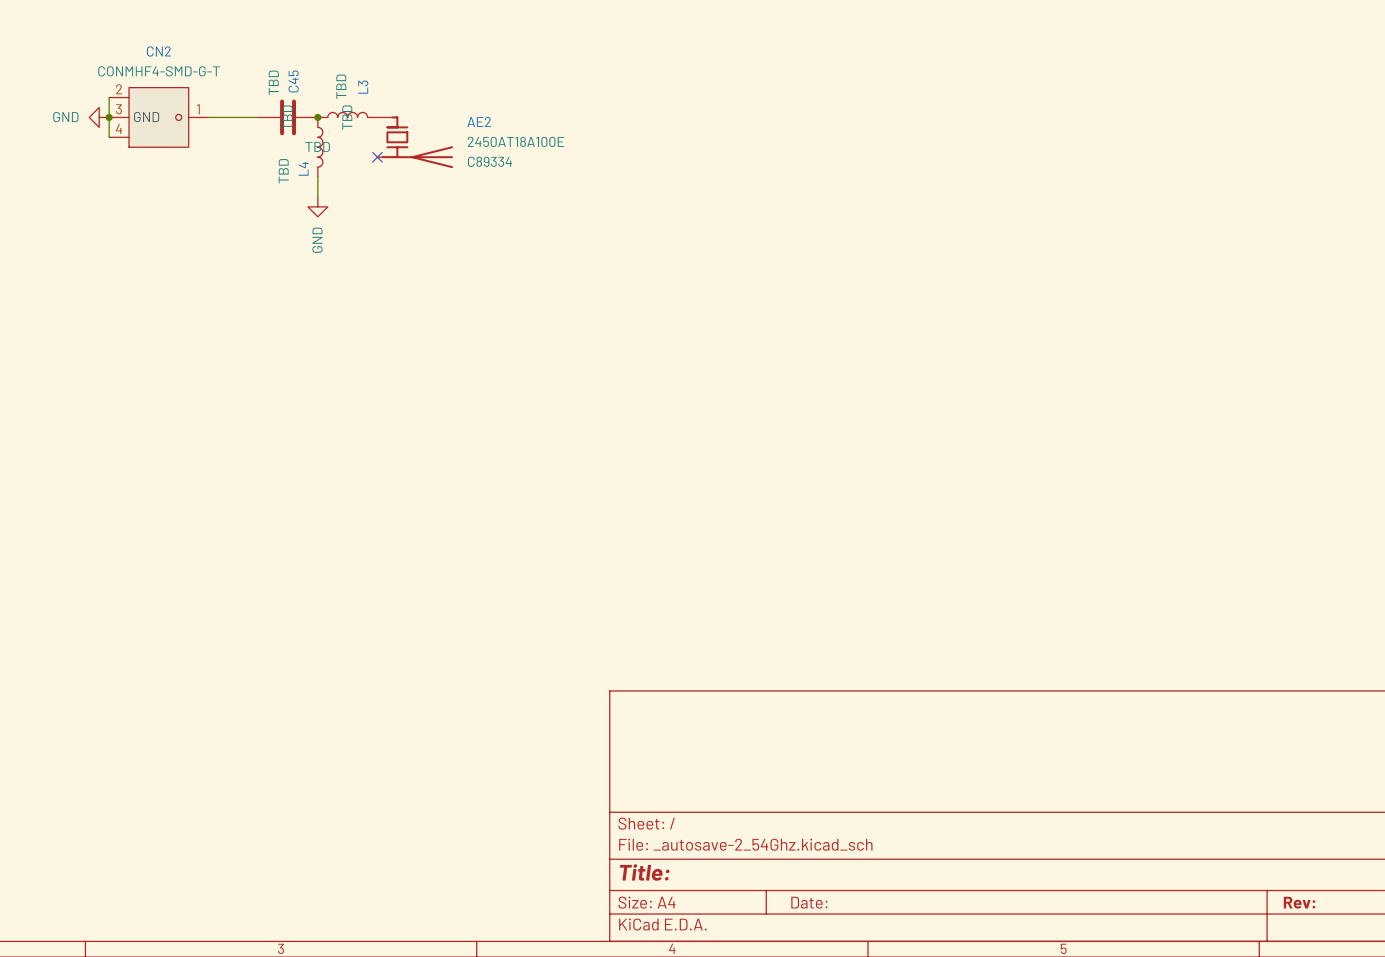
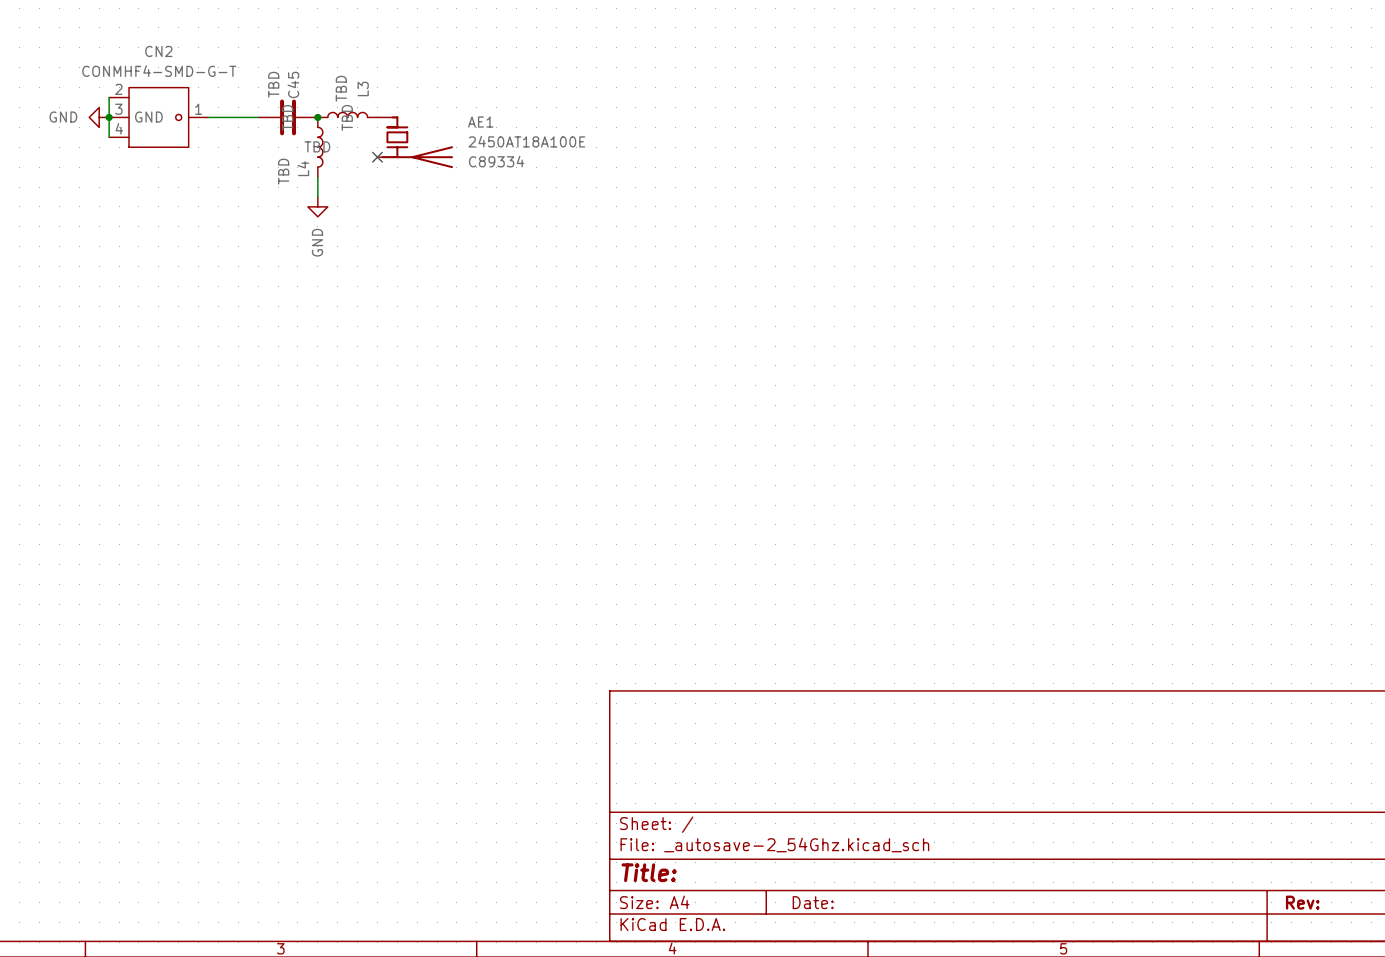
AE2 name: AE2 (479, 121) -> AE1 (480, 122)

